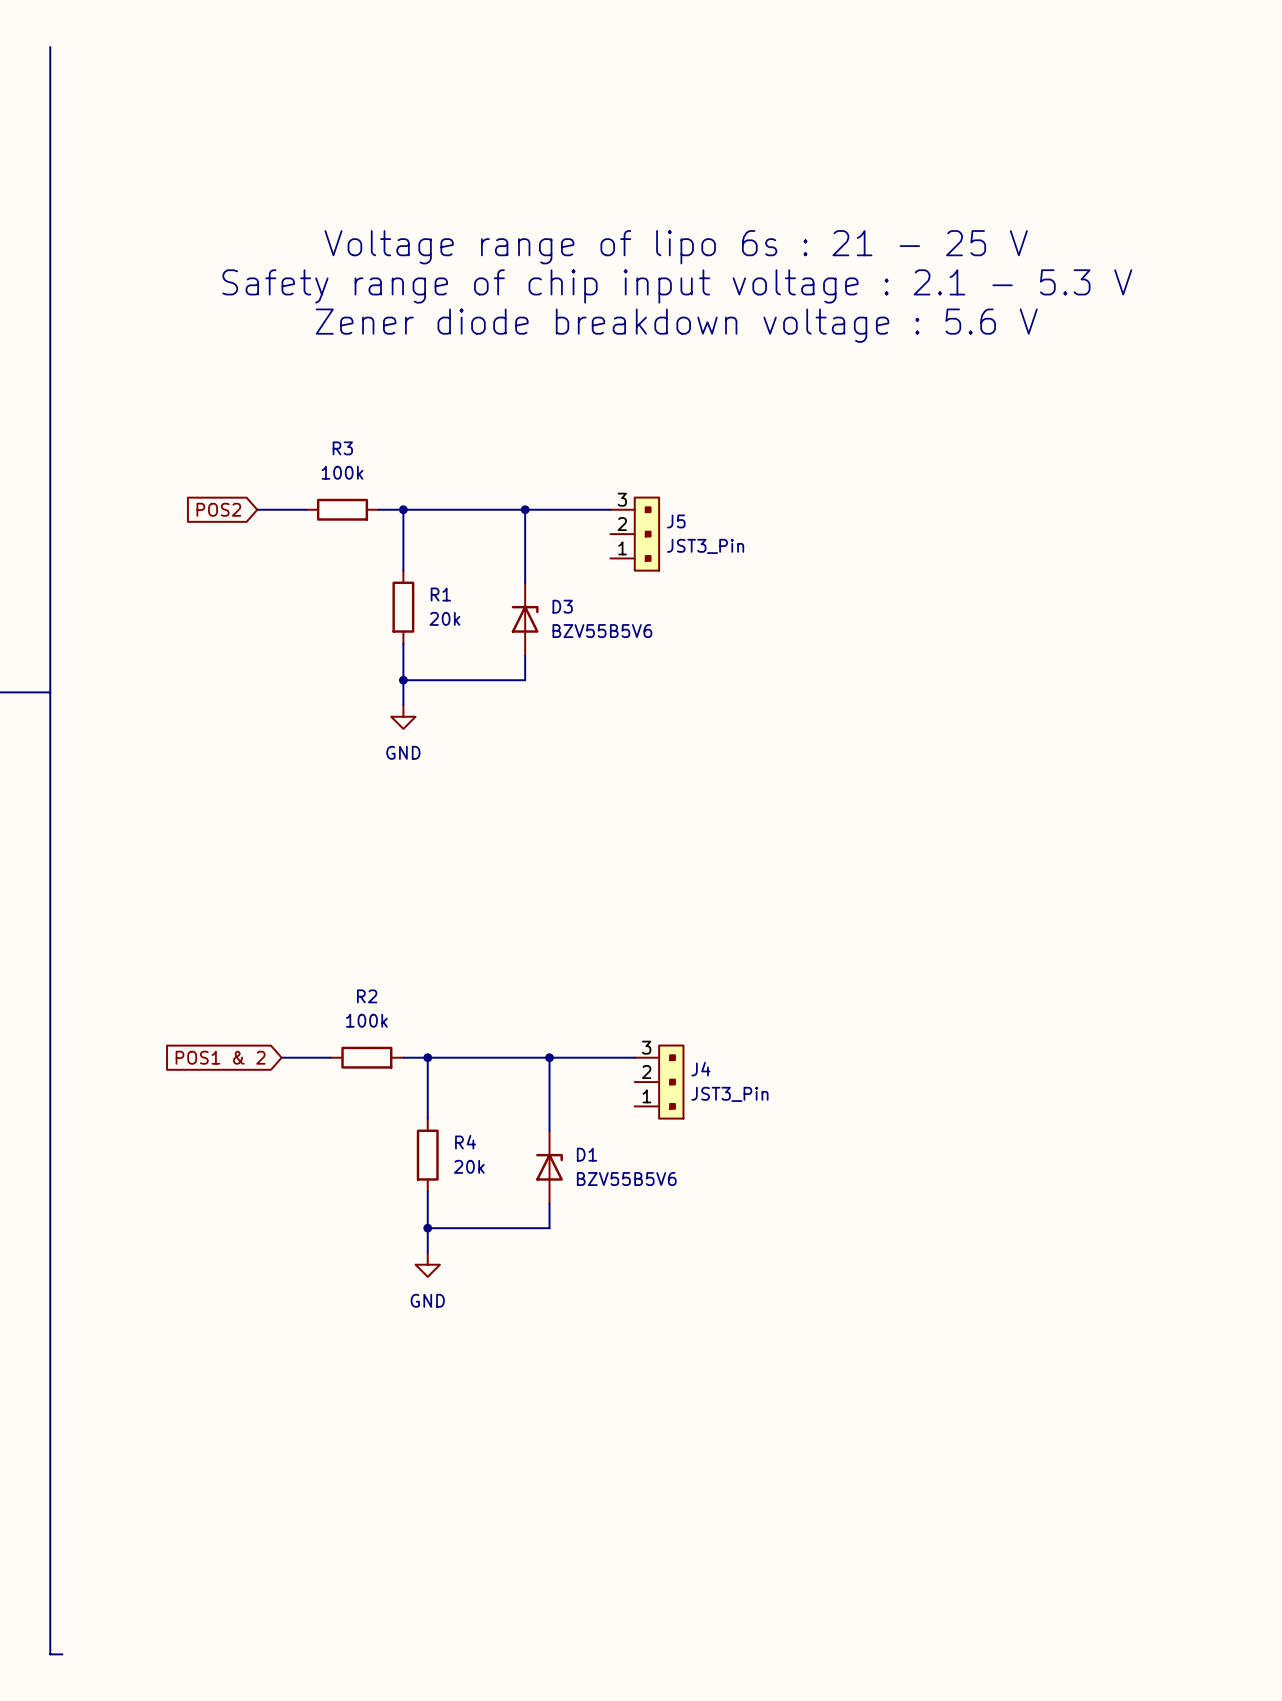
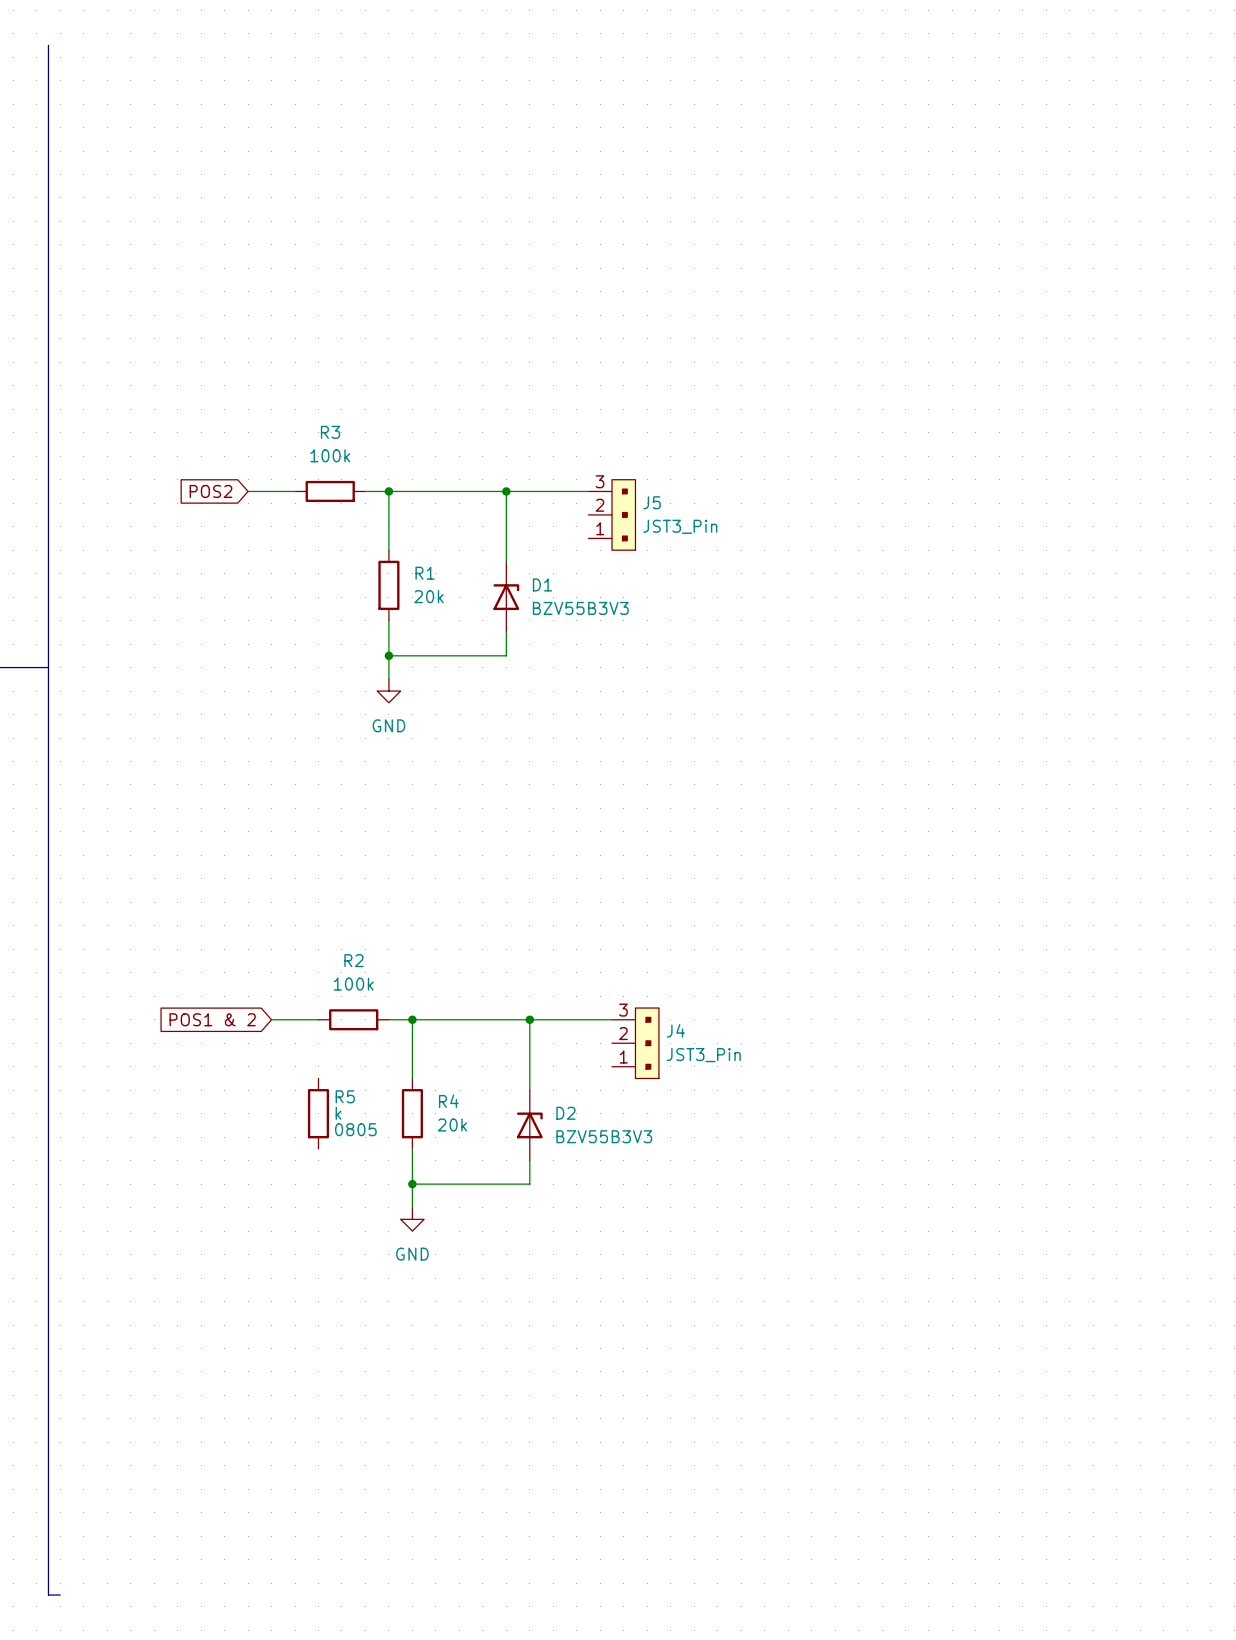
text: Voltage range of lipo 6s : 21 - 25 V (676, 247) -> none
text: Safety range of chip input voltage : 2.1 - 5.3 V (677, 286) -> none
text: Zener diode breakdown voltage : 5.6 V (676, 325) -> none
D3 name: D3 (562, 606) -> D1 (542, 584)
D3 value: BZV55B5V6 (602, 631) -> BZV55B3V3 (580, 608)
D1 name: D1 (587, 1154) -> D2 (565, 1113)
R5: none -> k (318, 1113)
D1 value: BZV55B5V6 (626, 1179) -> BZV55B3V3 (604, 1136)

